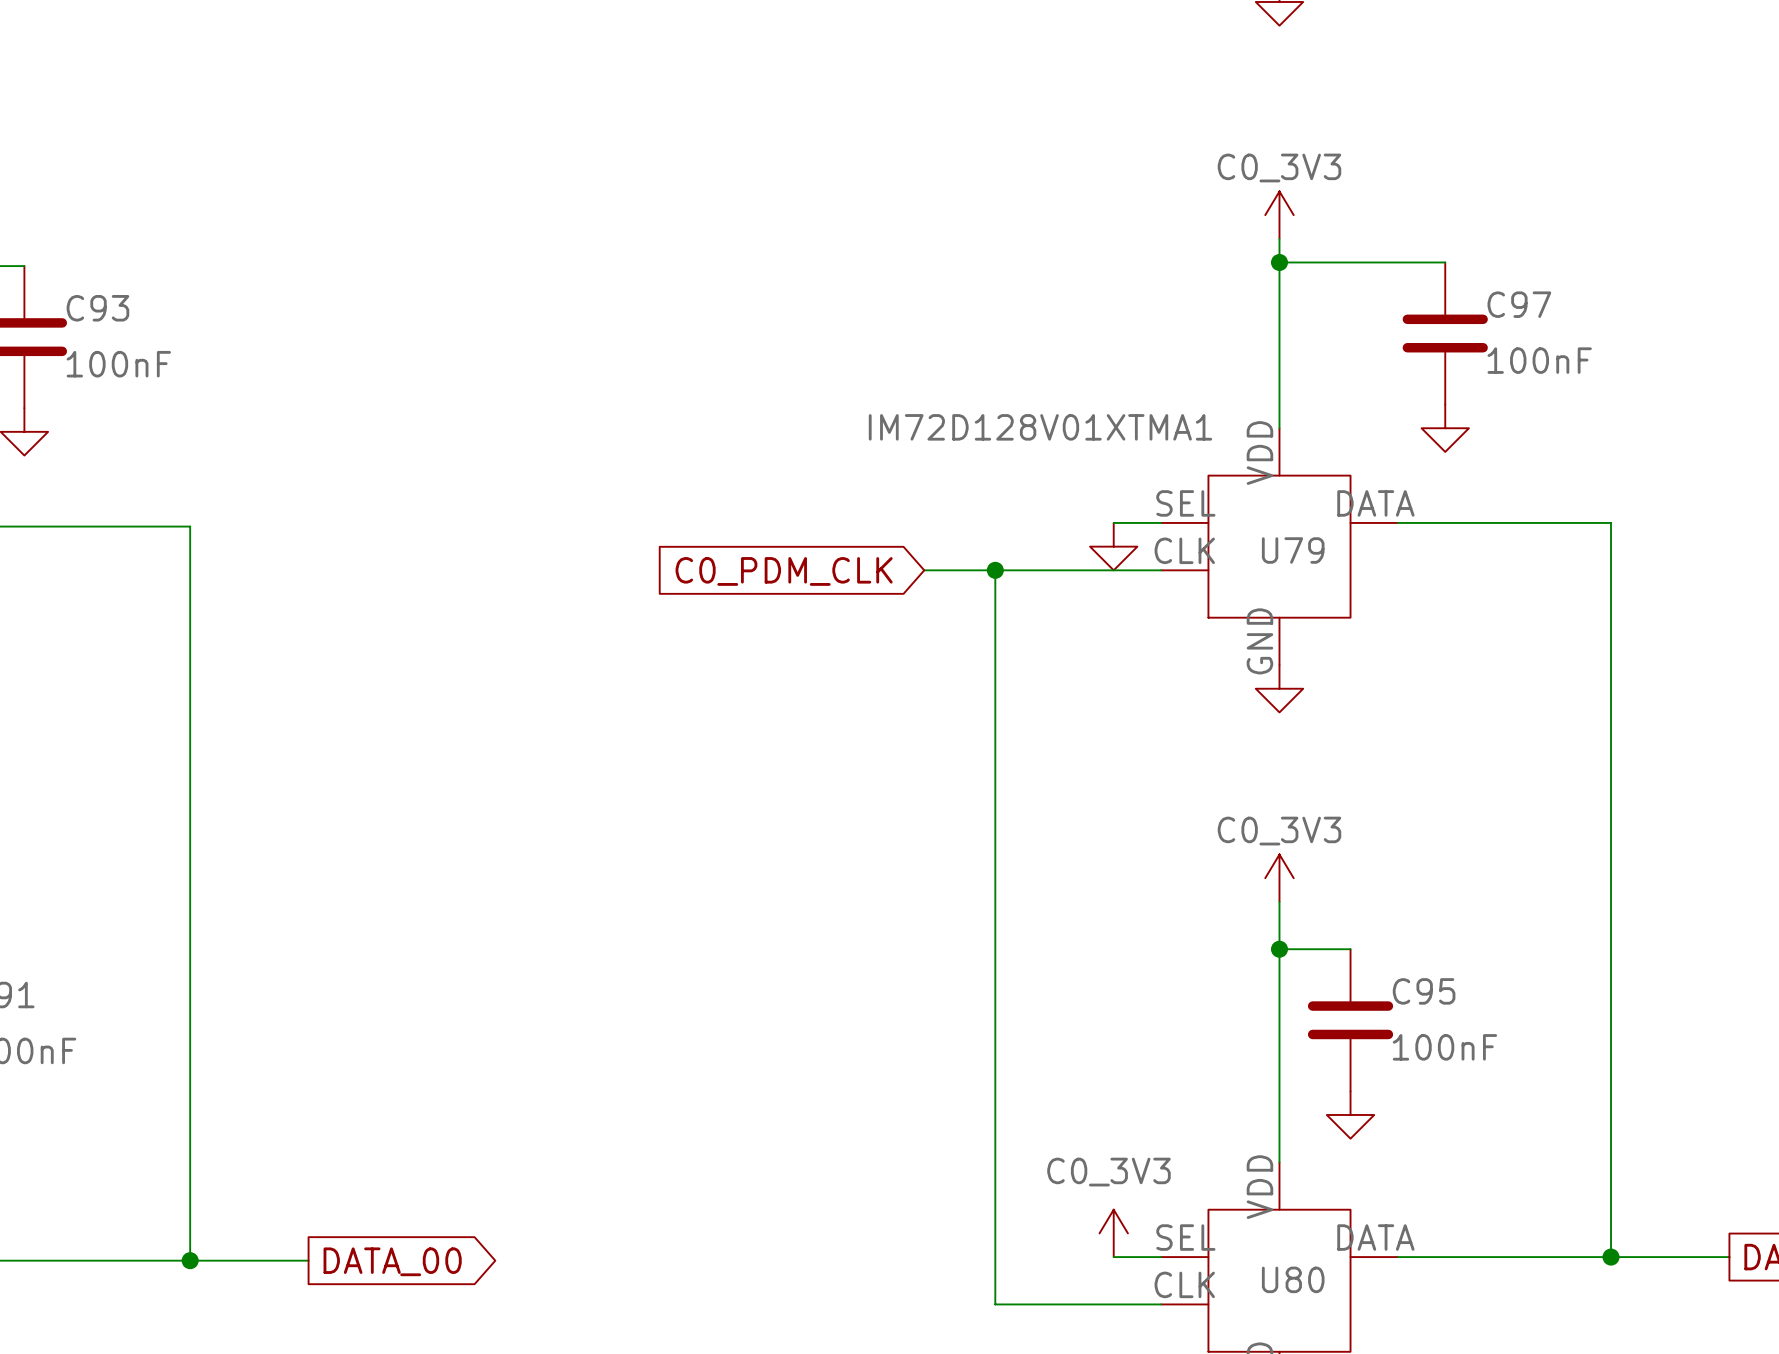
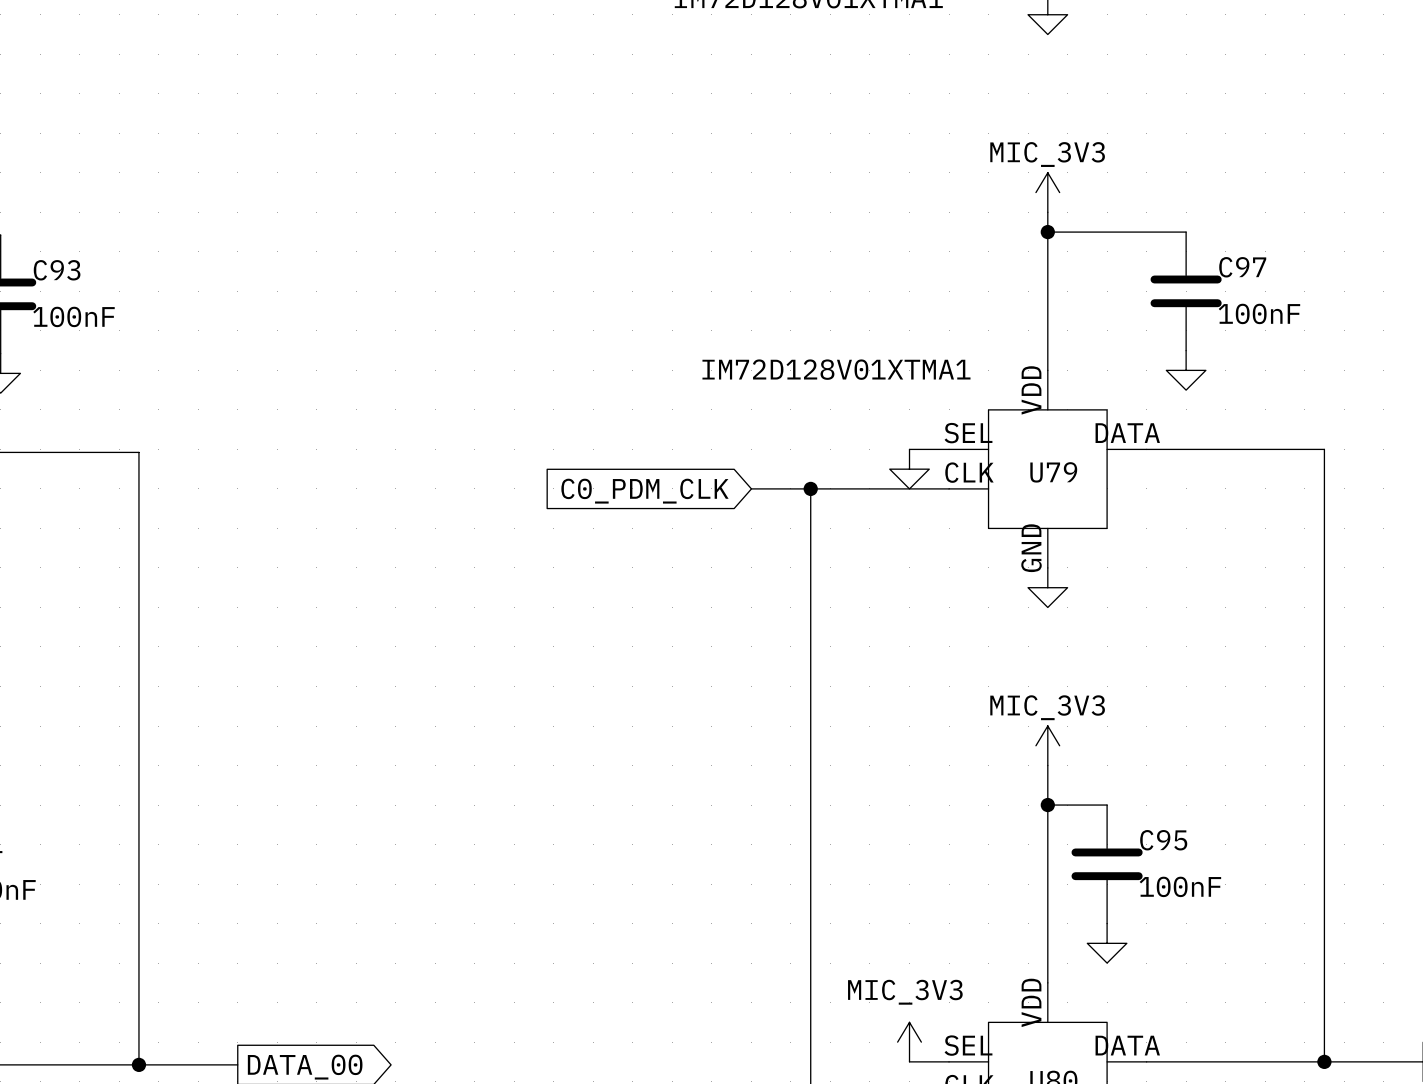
power symbol: C0_3V3 (1279, 215) -> MIC_3V3 (1047, 192)
power symbol: C0_3V3 (1279, 878) -> MIC_3V3 (1047, 745)
power symbol: C0_3V3 (1113, 1233) -> MIC_3V3 (909, 1042)

